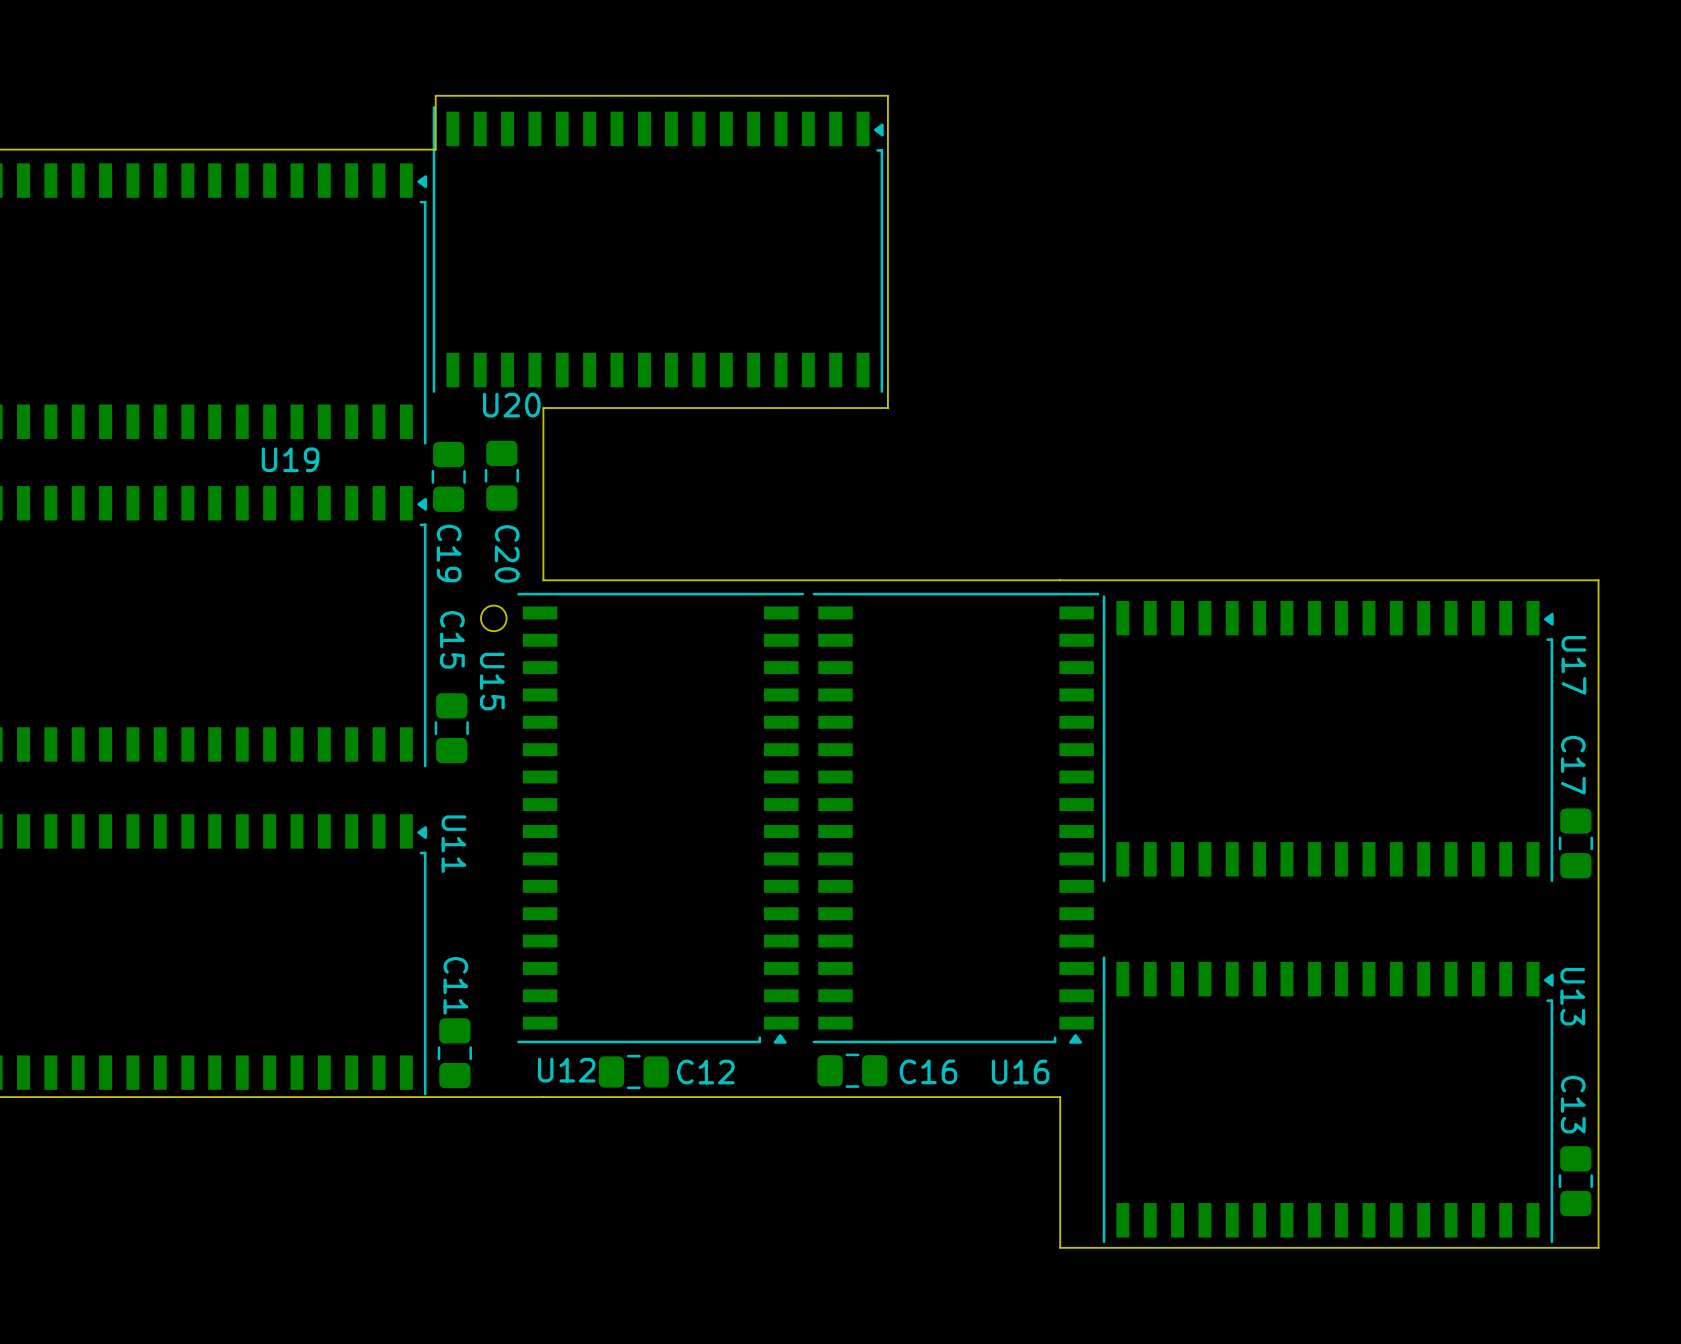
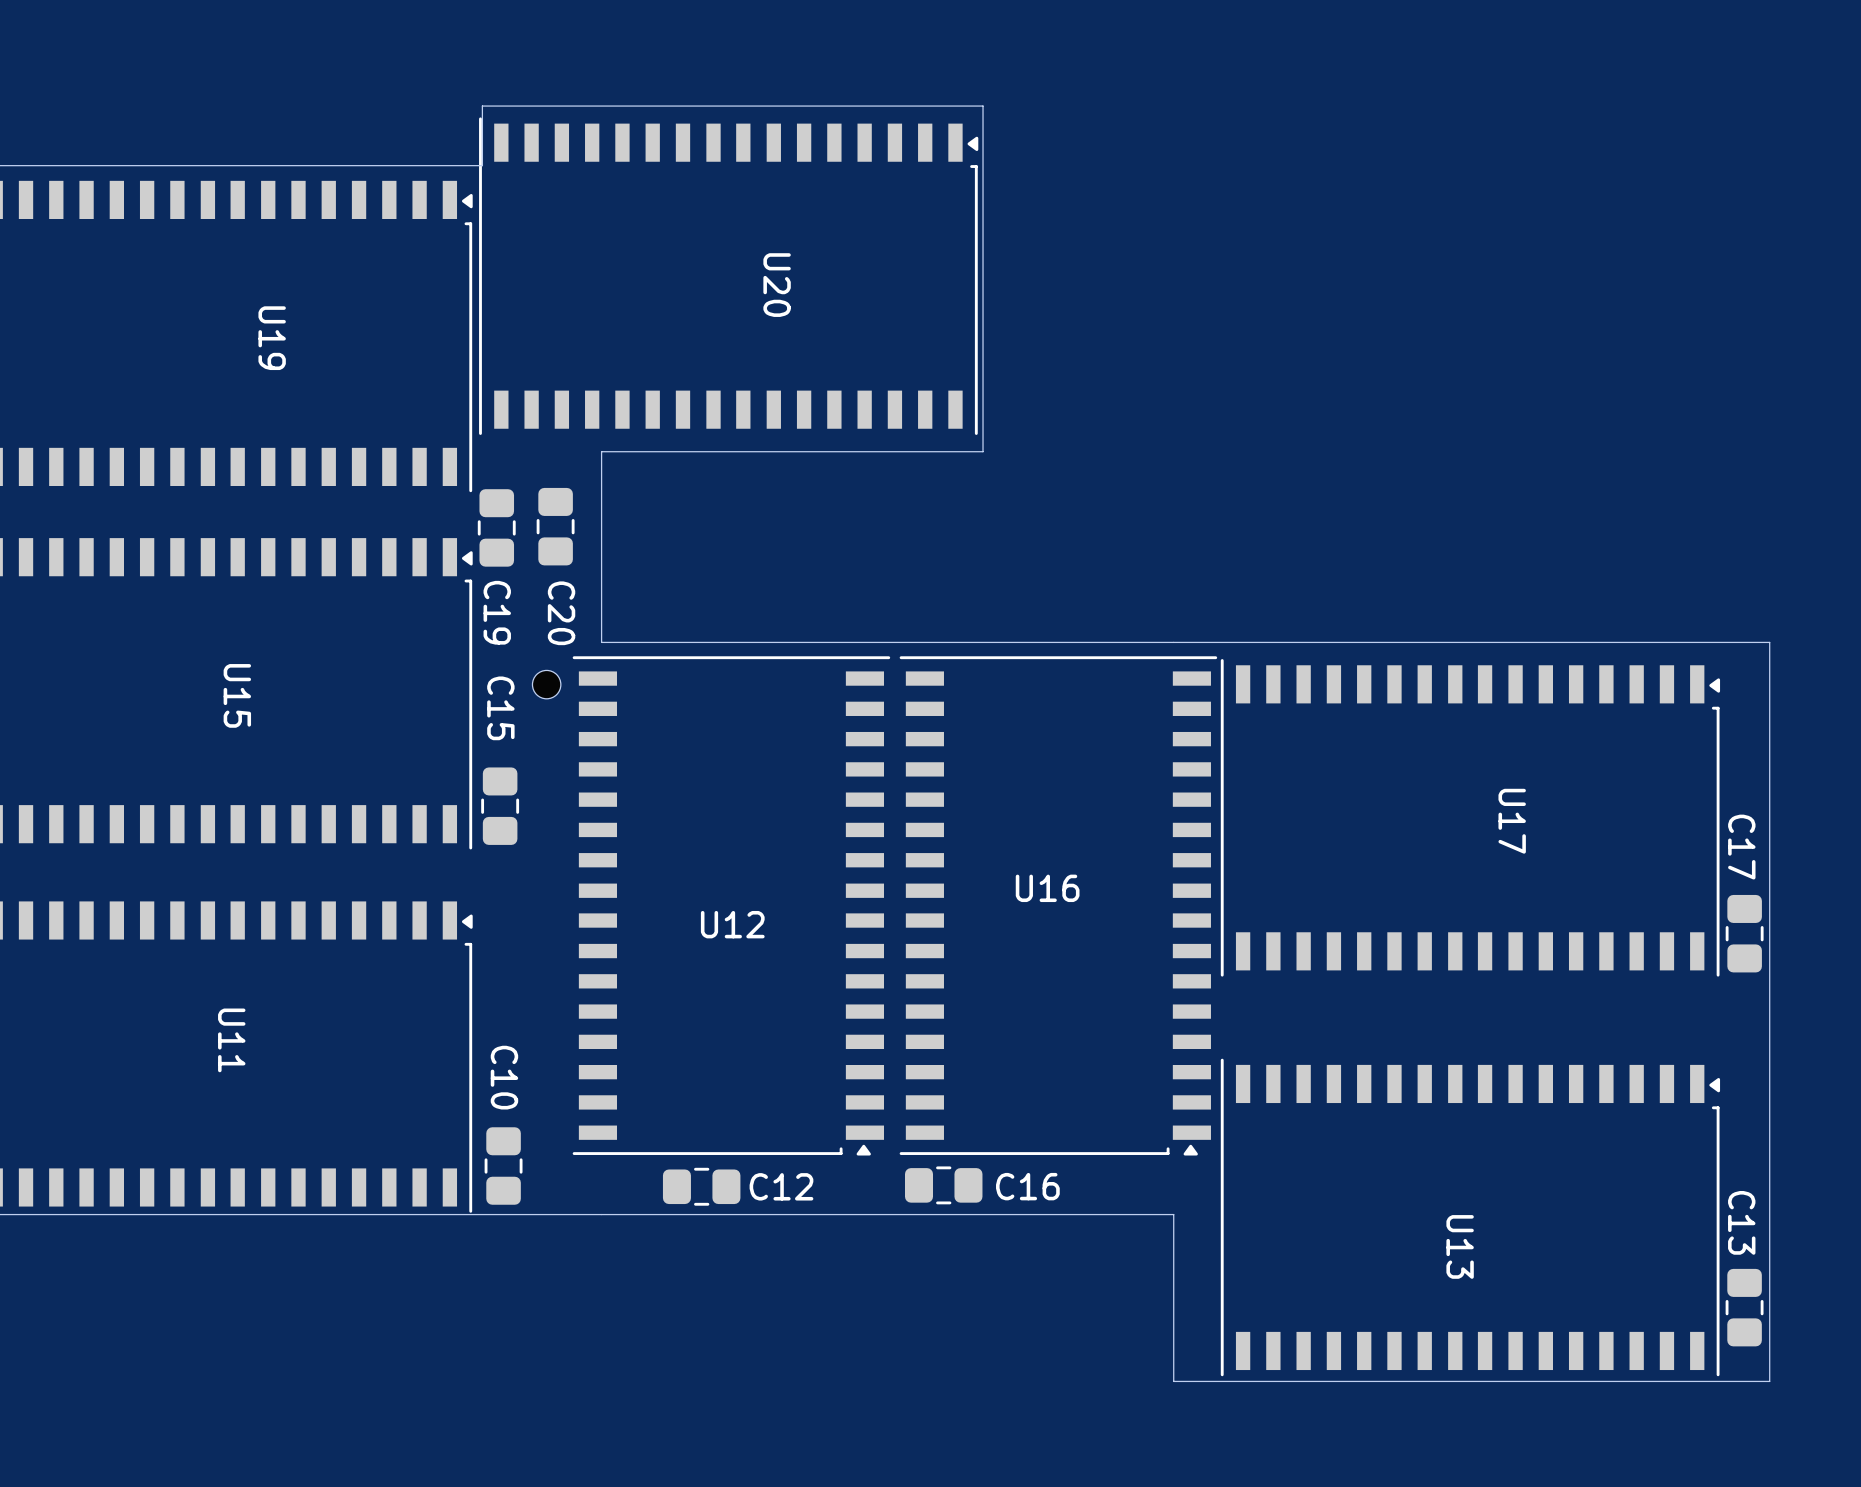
U20 name rotation: 0° (511, 405) -> 90° clockwise (777, 285)
U20 name position: U20 (511, 405) -> U20 (777, 285)
U19 name rotation: 0° (290, 459) -> 90° clockwise (272, 338)
U19 name position: U19 (290, 459) -> U19 (272, 338)
U17 name position: U17 (1573, 665) -> U17 (1512, 821)
U15 name position: U15 (492, 681) -> U15 (237, 695)
U11 name position: U11 (453, 844) -> U11 (231, 1040)
C11 name: C11 (455, 985) -> C10 (504, 1077)
U13 name position: U13 (1572, 996) -> U13 (1460, 1246)
U12 name position: U12 (566, 1070) -> U12 (732, 924)
U16 name position: U16 (1020, 1072) -> U16 (1047, 888)

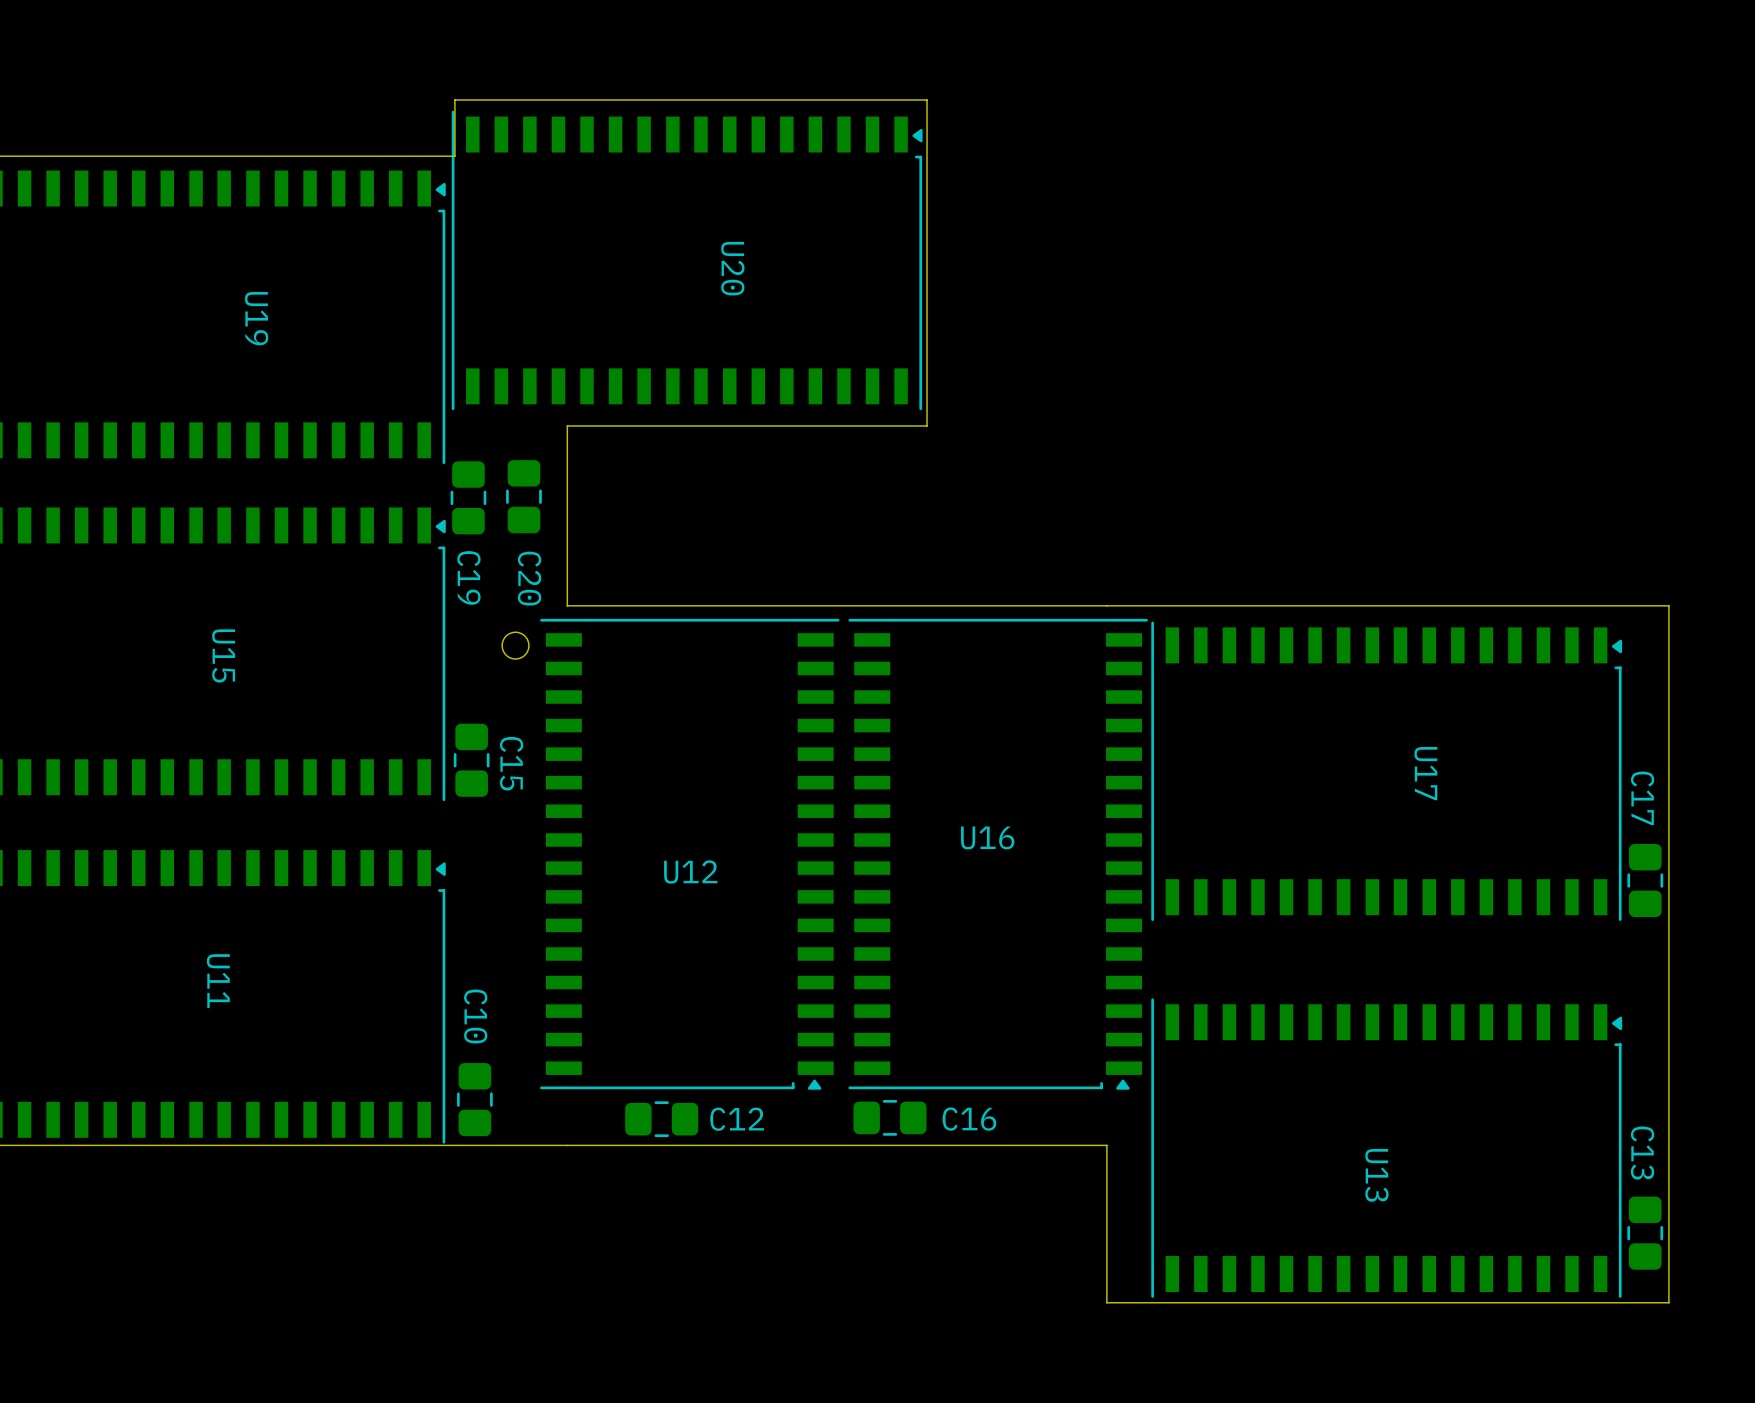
C15 name position: C15 (500, 708) -> C15 (511, 763)

